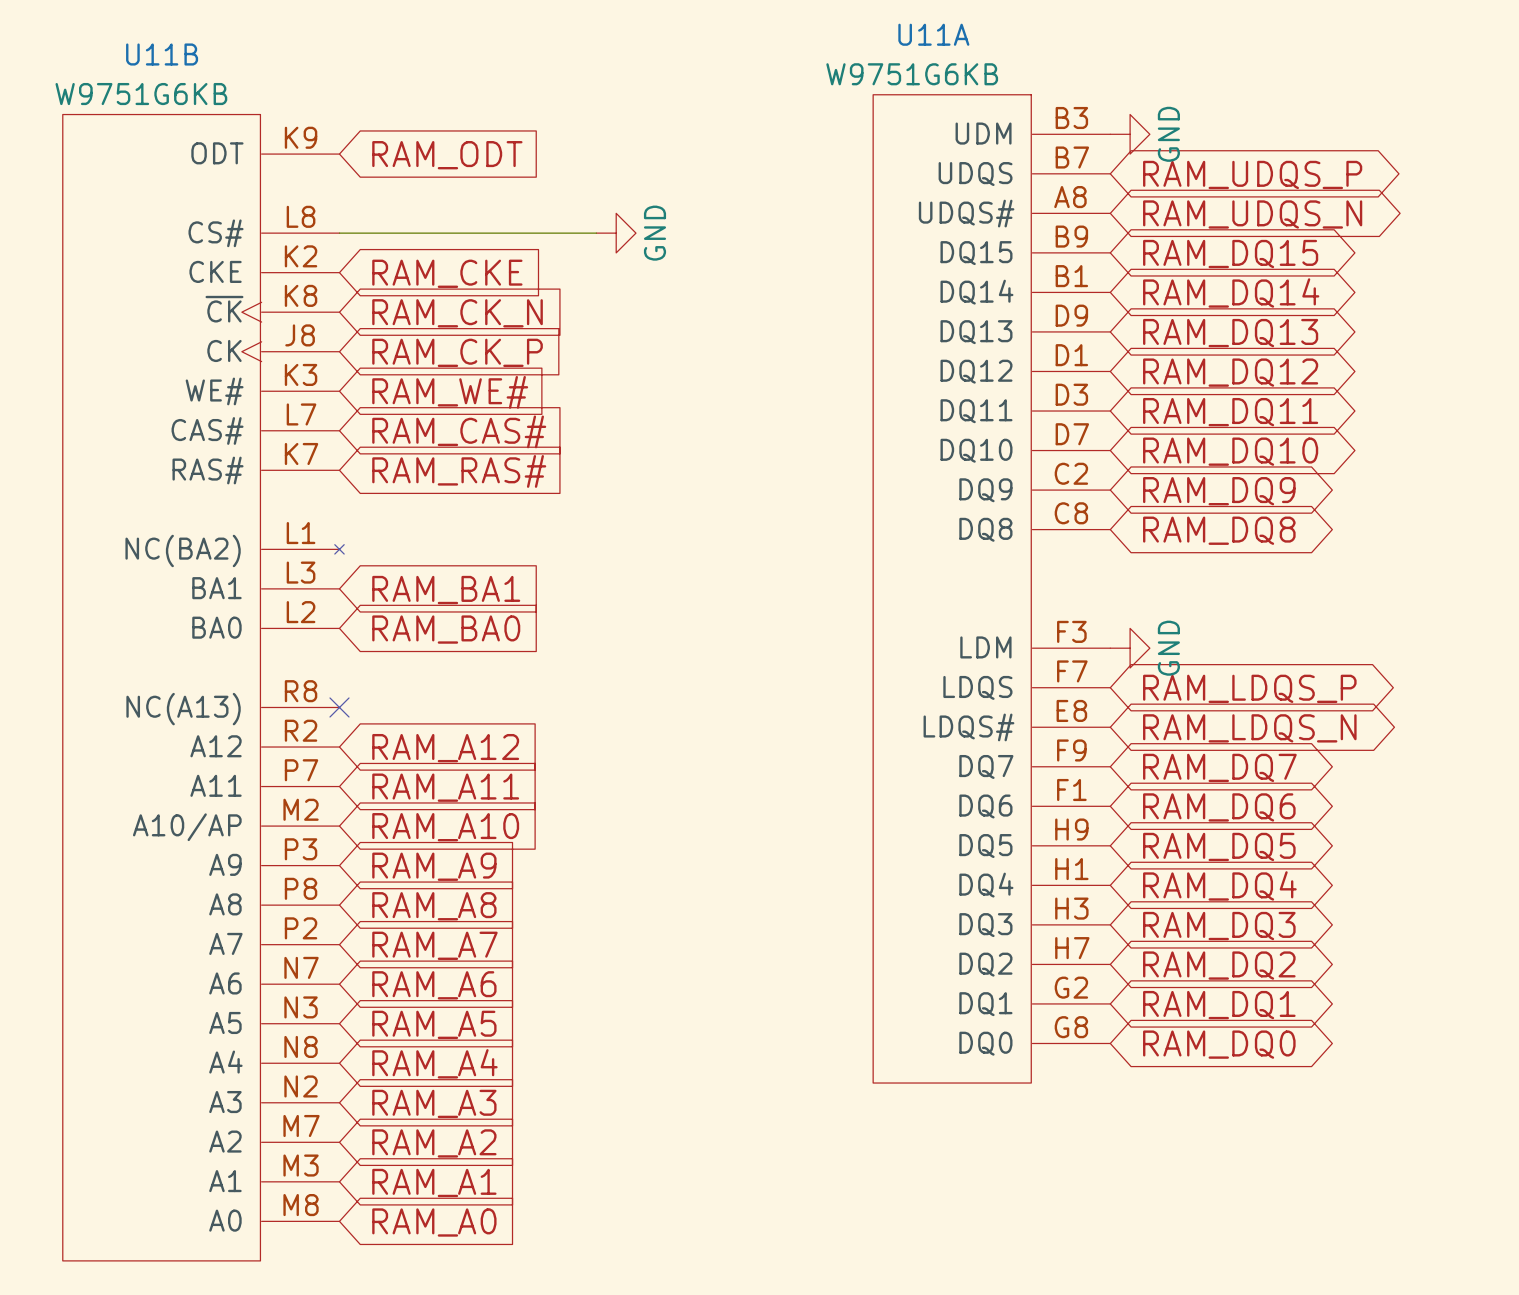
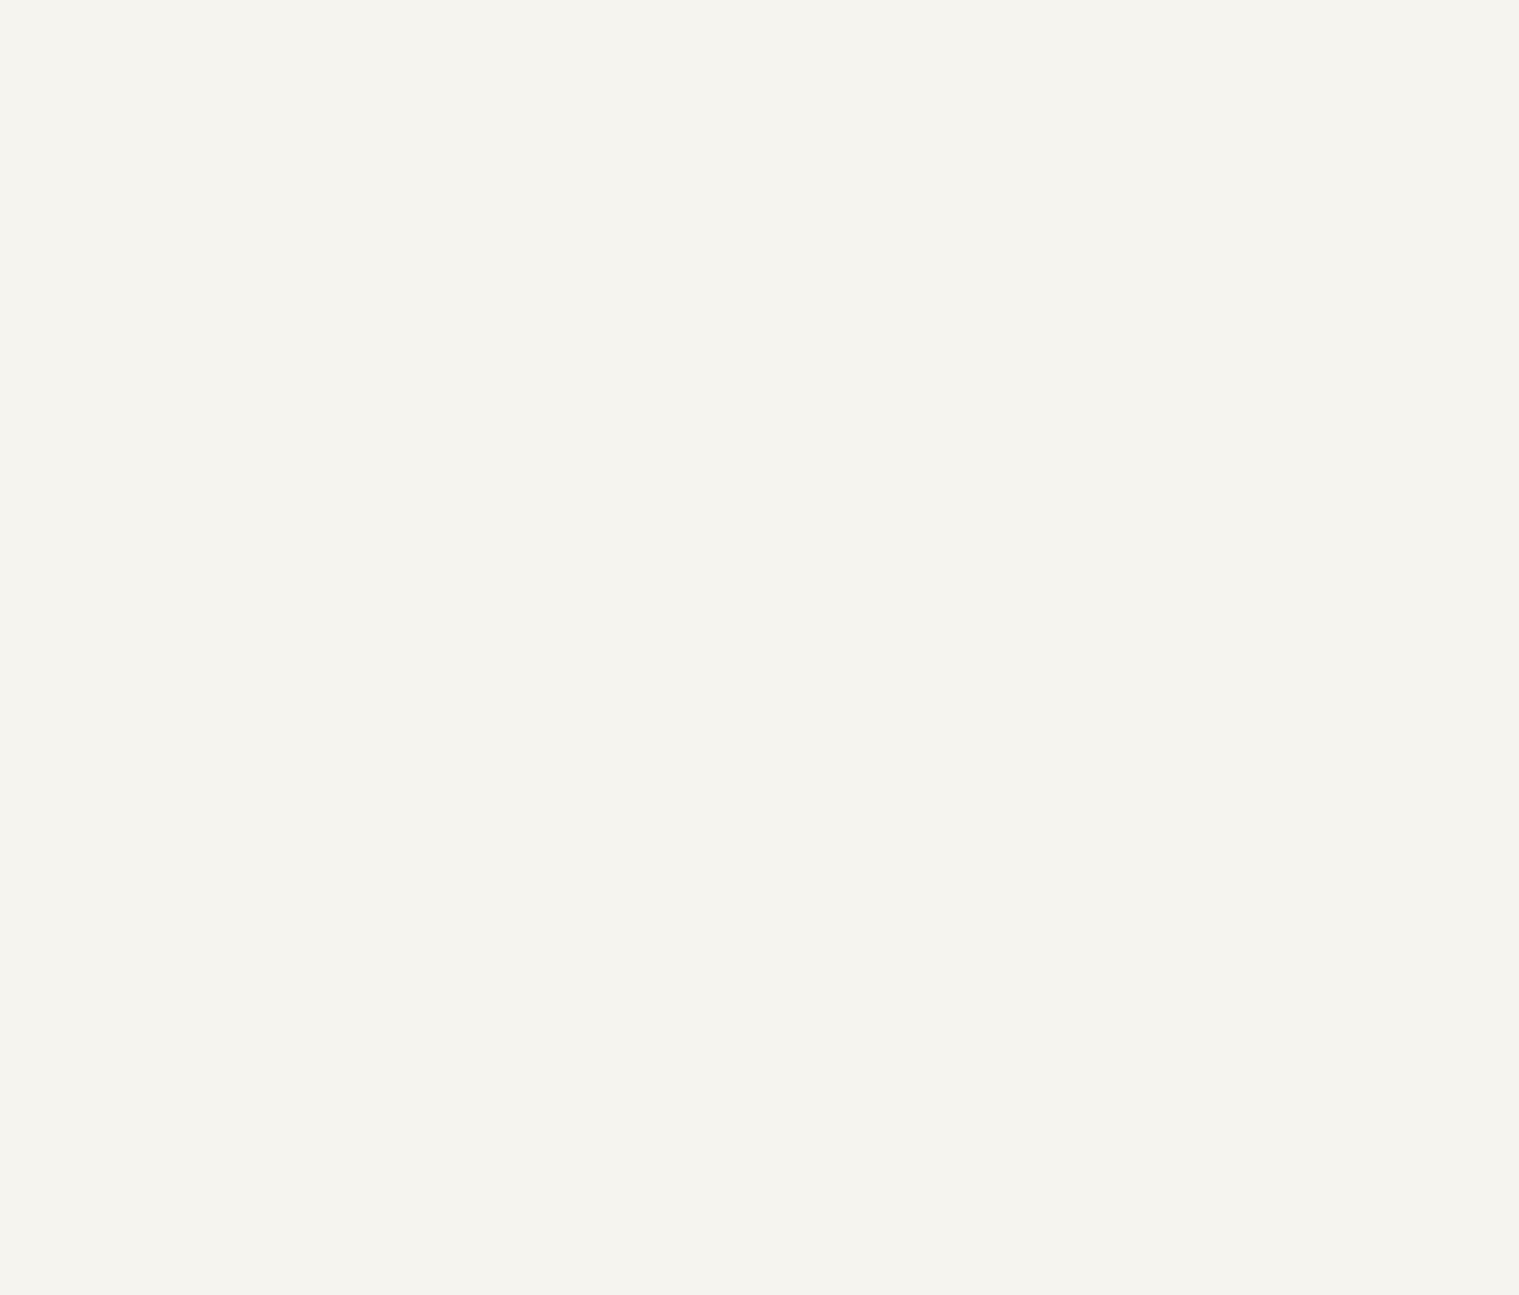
power symbol: GND (1130, 134) -> none
global label: RAM_ODT (447, 155) -> none
global label: RAM_UDQS_P (1252, 174) -> none
global label: RAM_UDQS_N (1252, 214) -> none
wire: (339, 233) (596, 233) -> none
power symbol: GND (616, 233) -> none
global label: RAM_DQ15 (1230, 254) -> none
global label: RAM_CKE (447, 273) -> none
global label: RAM_DQ14 (1231, 292) -> none
global label: RAM_CK_N (457, 313) -> none
global label: RAM_DQ13 (1230, 333) -> none
global label: RAM_CK_P (457, 352) -> none
global label: RAM_DQ12 (1230, 372) -> none
global label: RAM_WE# (450, 392) -> none
global label: RAM_DQ11 (1230, 412) -> none
global label: RAM_CAS# (459, 431) -> none
global label: RAM_DQ10 (1230, 451) -> none
global label: RAM_RAS# (459, 471) -> none
global label: RAM_DQ9 (1219, 491) -> none
global label: RAM_DQ8 (1219, 530) -> none
U11A: W9751G6KB (991, 588) -> none
global label: RAM_BA1 (446, 590) -> none
global label: RAM_BA0 (446, 629) -> none
power symbol: GND (1130, 648) -> none
U11B: W9751G6KB (203, 687) -> none
global label: RAM_LDQS_P (1249, 688) -> none
no-connect mark: (339, 707) -> none
global label: RAM_LDQS_N (1249, 728) -> none
global label: RAM_A12 (445, 748) -> none
global label: RAM_DQ7 (1219, 767) -> none
global label: RAM_A11 (445, 787) -> none
global label: RAM_DQ6 (1219, 807) -> none
global label: RAM_A10 (445, 827) -> none
global label: RAM_DQ5 (1219, 846) -> none
global label: RAM_A9 (434, 866) -> none
global label: RAM_DQ4 (1219, 885) -> none
global label: RAM_A8 (434, 906) -> none
global label: RAM_DQ3 (1219, 926) -> none
global label: RAM_A7 (434, 945) -> none
global label: RAM_DQ2 (1219, 965) -> none
global label: RAM_A6 (434, 985) -> none
global label: RAM_DQ1 (1219, 1005) -> none
global label: RAM_A5 (434, 1024) -> none
global label: RAM_DQ0 (1219, 1044) -> none
global label: RAM_A4 (434, 1063) -> none
global label: RAM_A3 (434, 1103) -> none
global label: RAM_A2 (434, 1143) -> none
global label: RAM_A1 (434, 1182) -> none
global label: RAM_A0 (434, 1222) -> none

